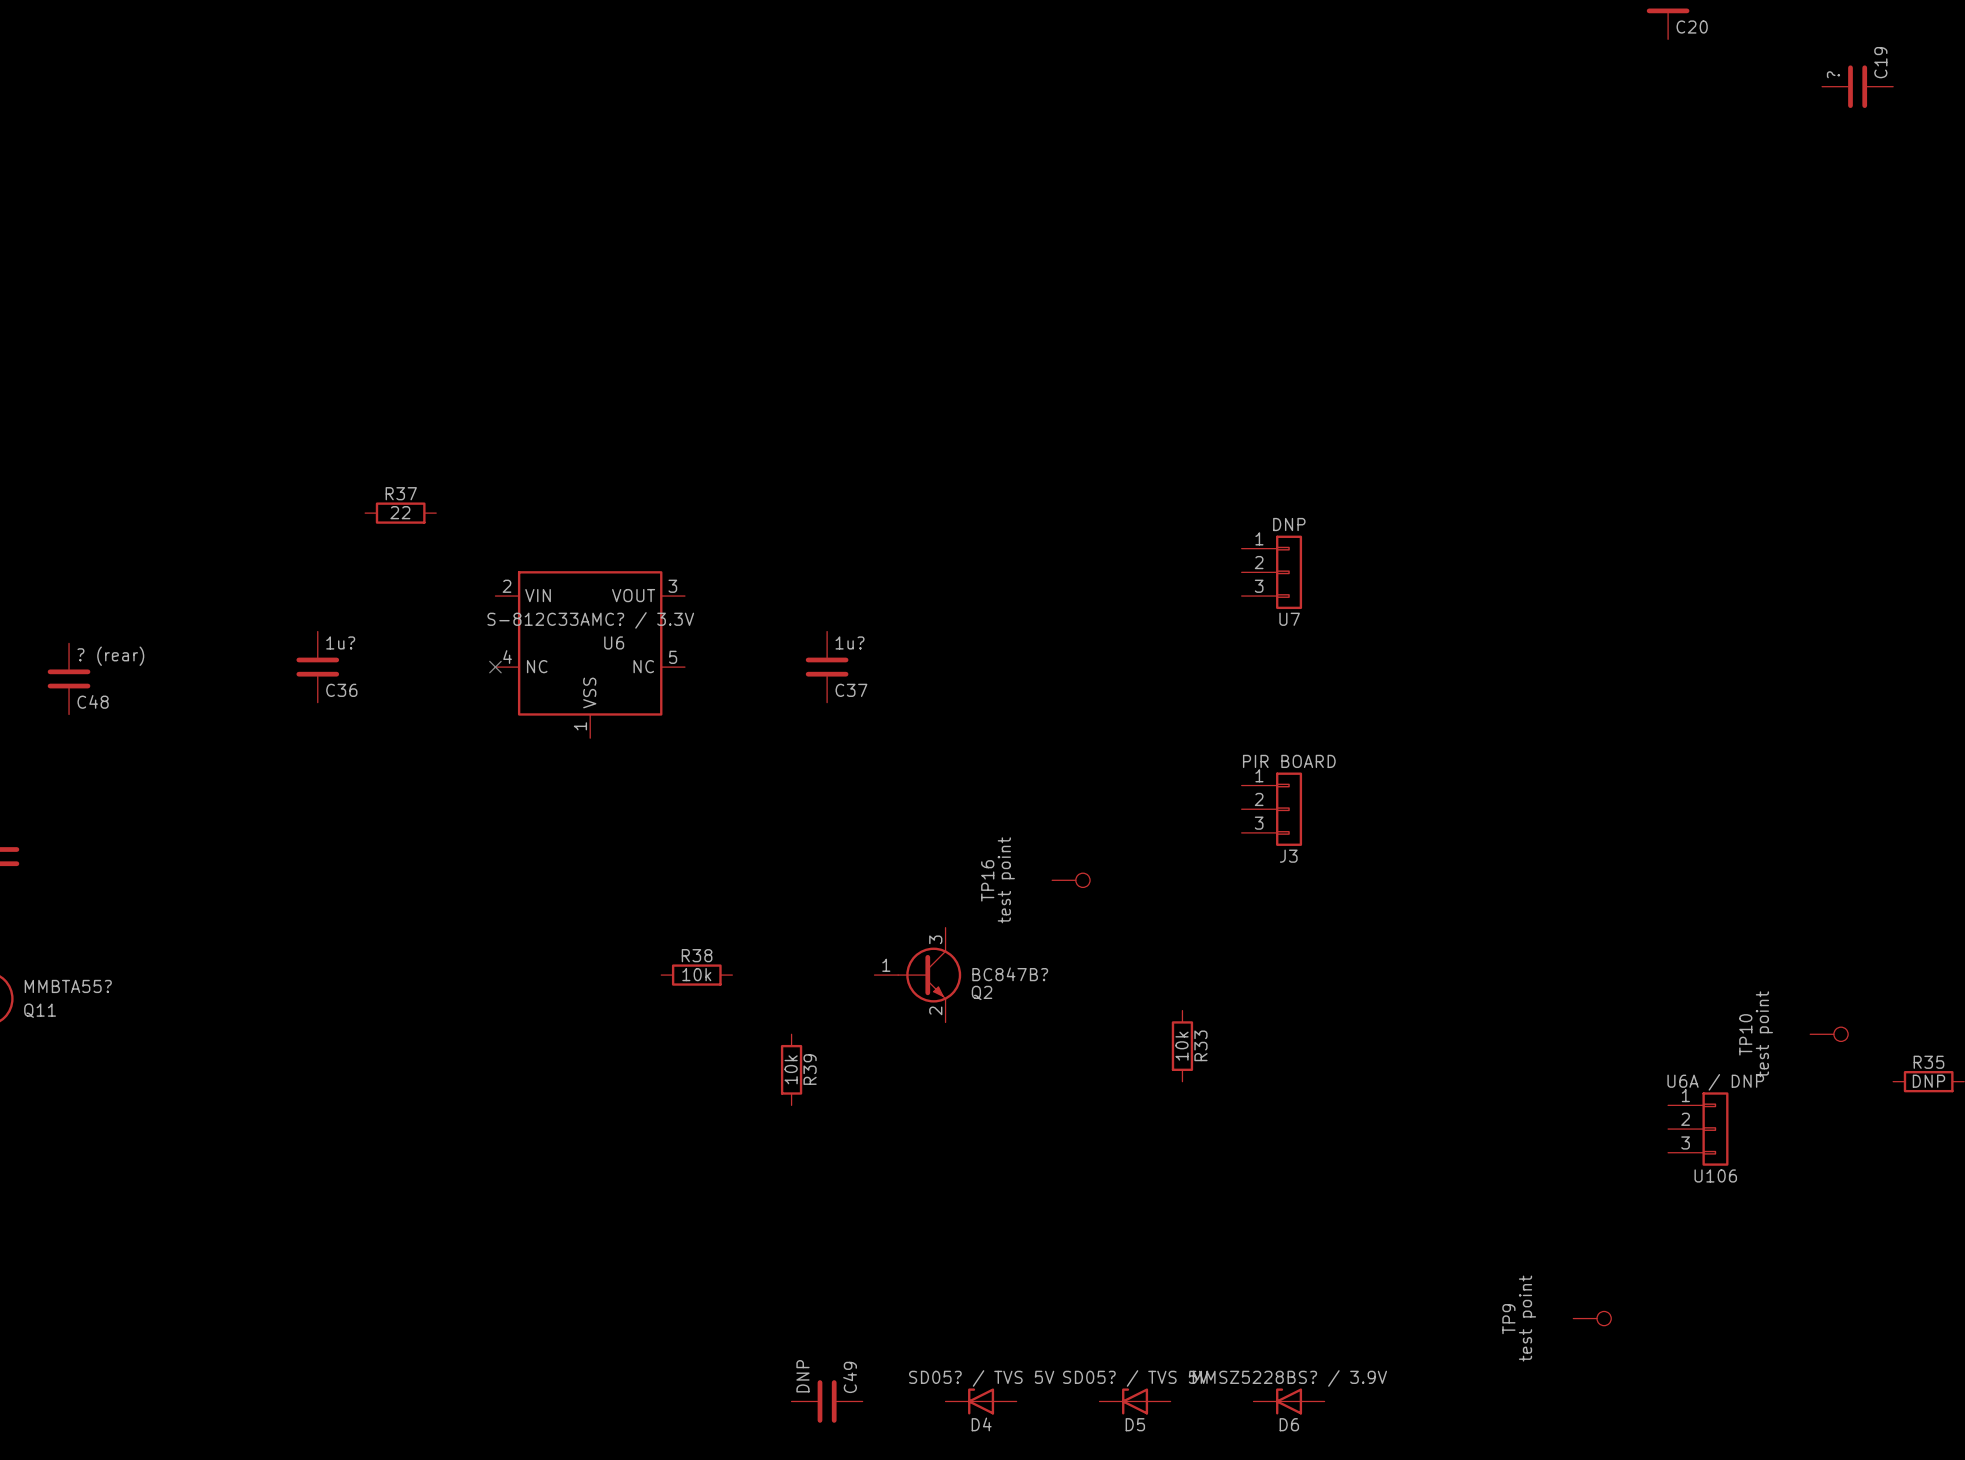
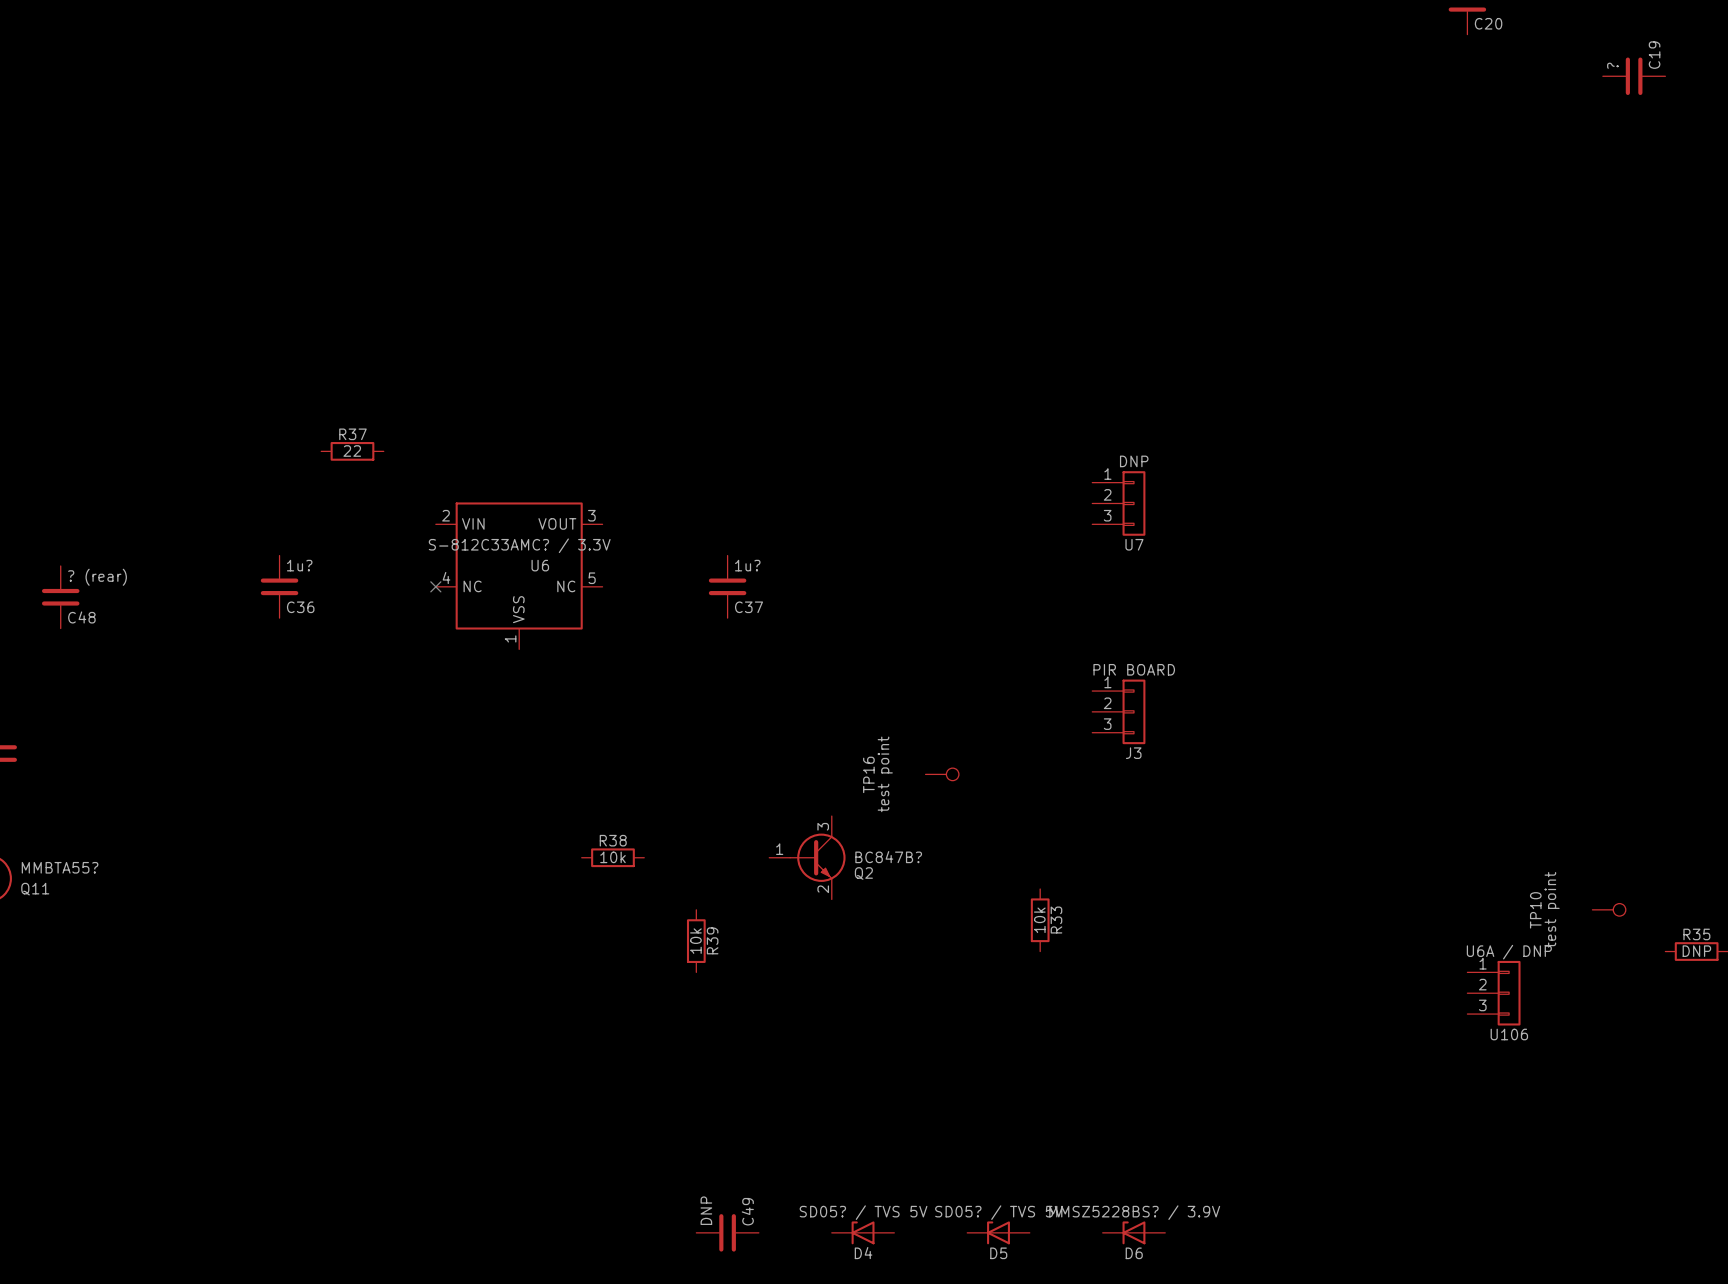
TP9: test point (1592, 1318) -> none

